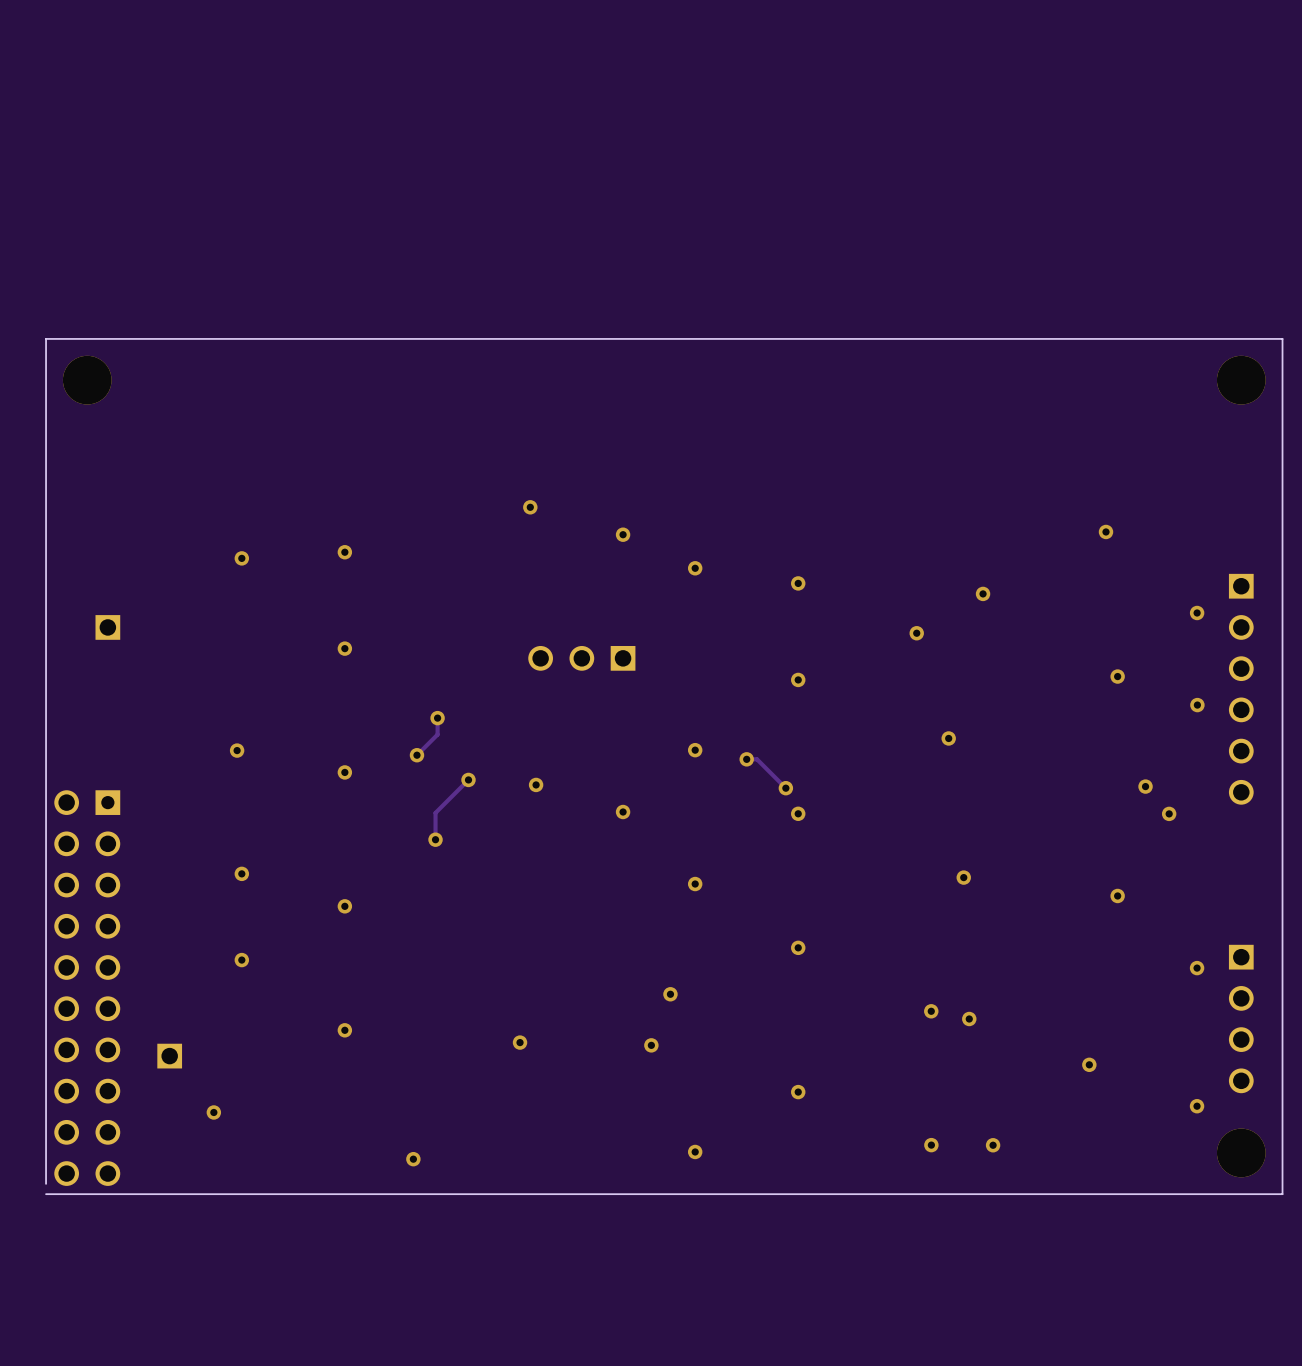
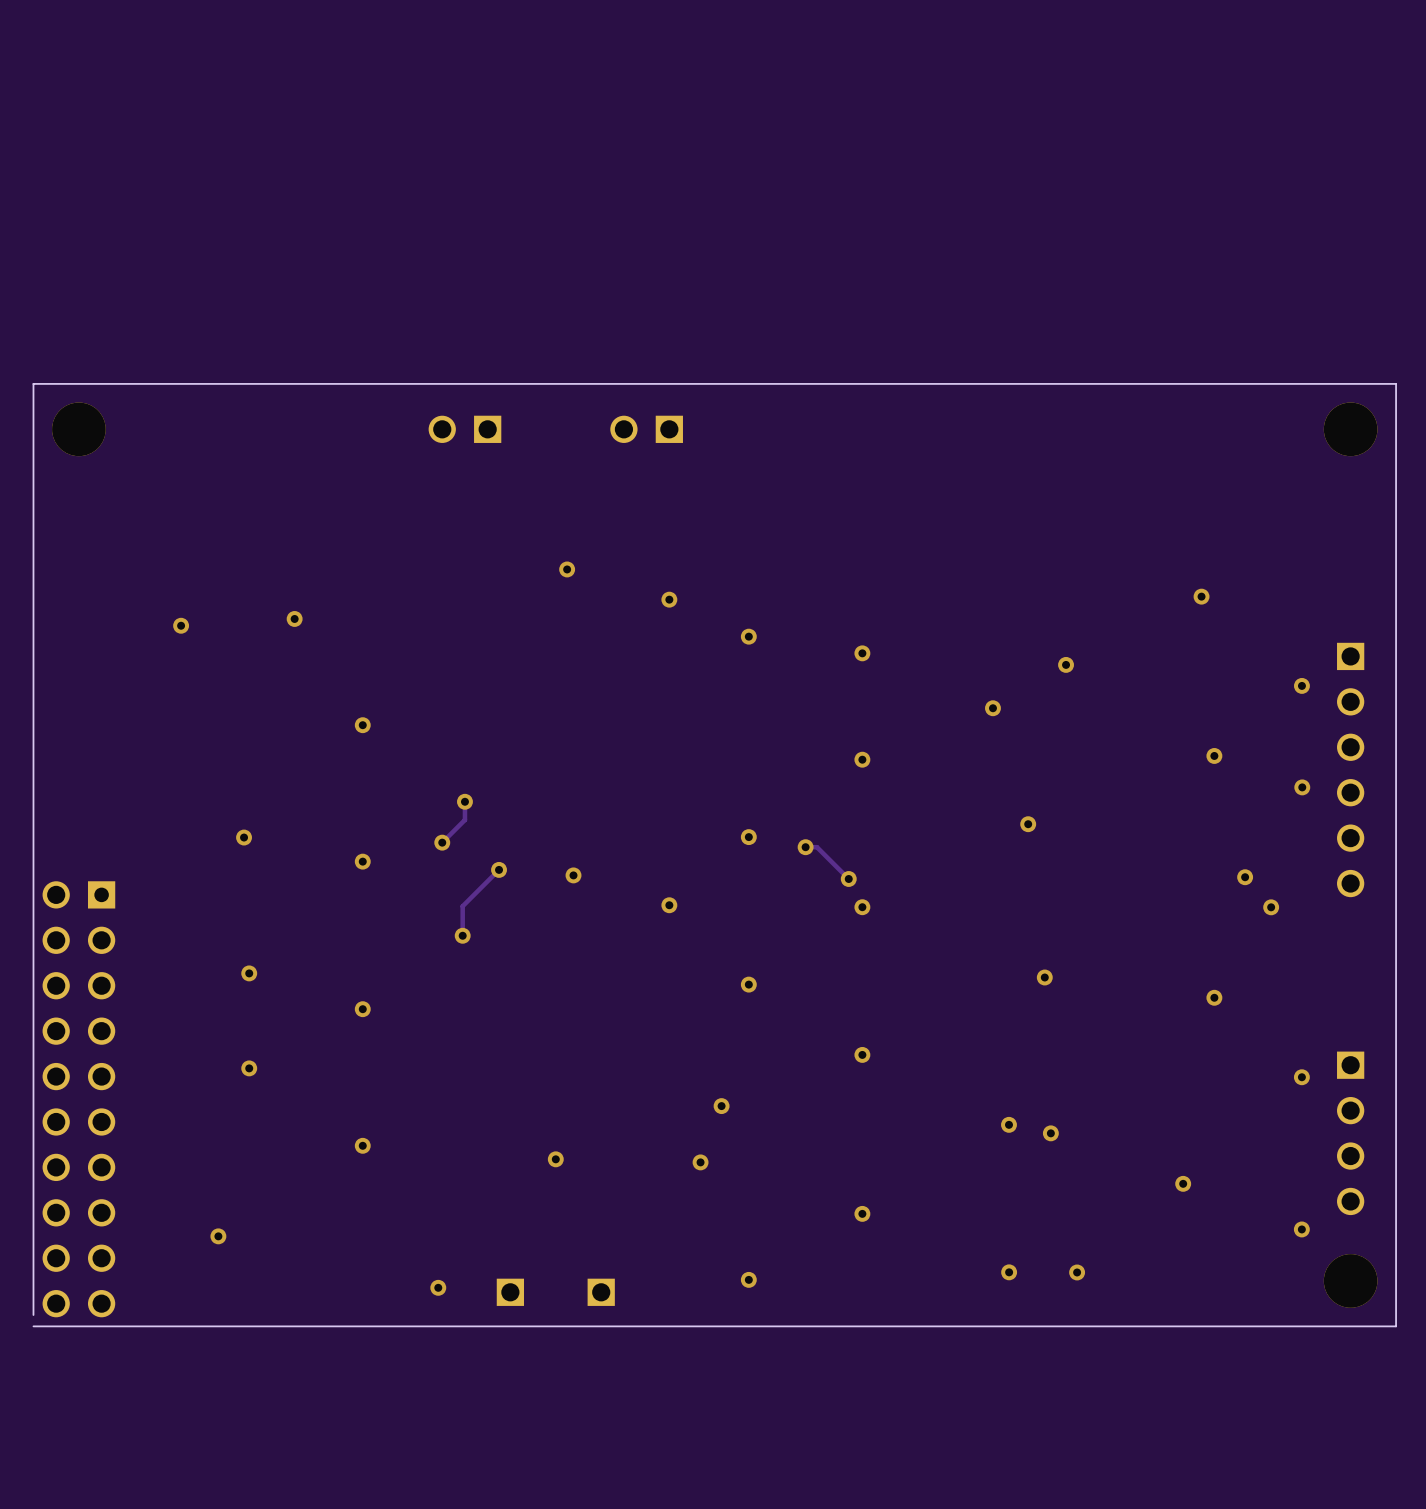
part: none -> (464, 429)
part: none -> (646, 429)
via: none -> (294, 618)
via: (344, 552) -> none
via: none -> (181, 625)
via: (241, 558) -> none
part: (107, 627) -> none
part: (581, 658) -> none
part: (169, 1056) -> none
part: none -> (510, 1292)
part: none -> (601, 1292)

